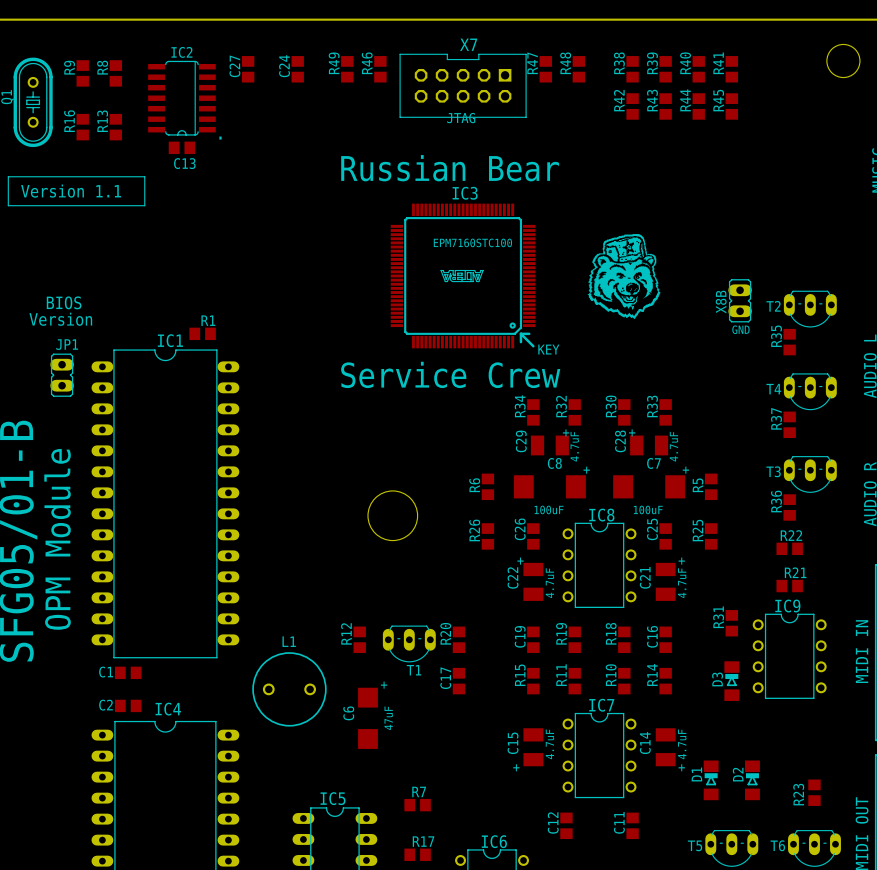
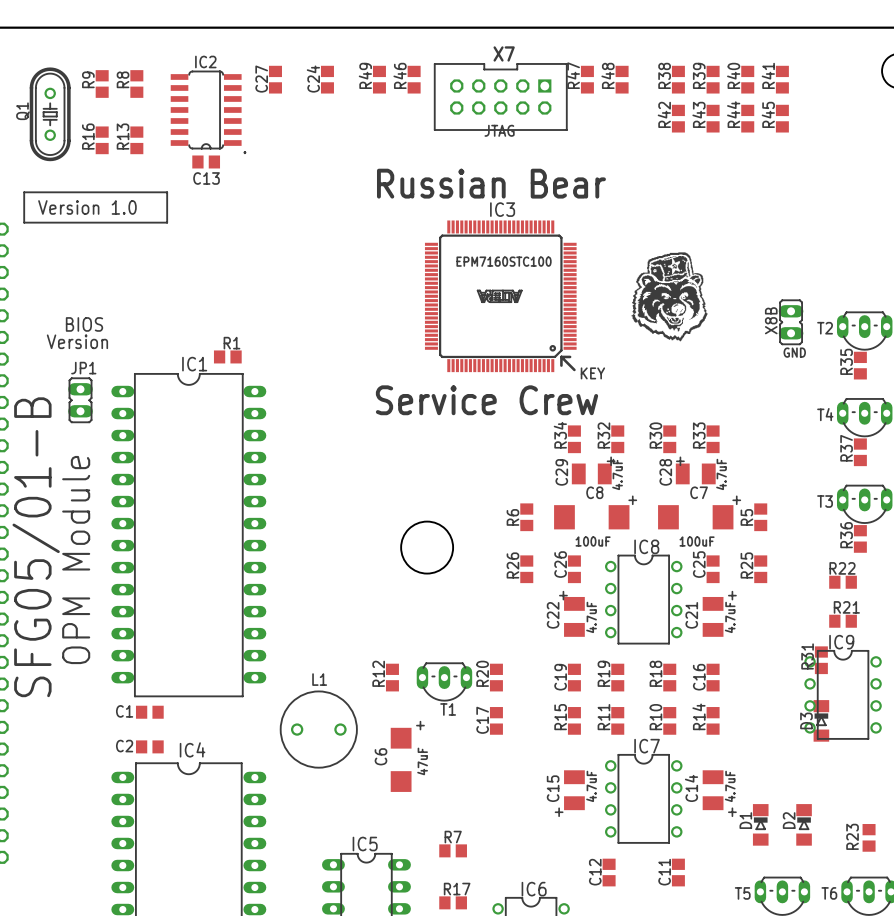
text: Version 1.1 (71, 191) -> Version 1.0 (87, 207)
R35 position: (789, 342) -> (860, 365)
R37 position: (789, 424) -> (860, 452)
R36 position: (789, 507) -> (860, 538)
R31 position: (731, 623) -> (821, 660)
D3 position: (731, 681) -> (821, 720)

